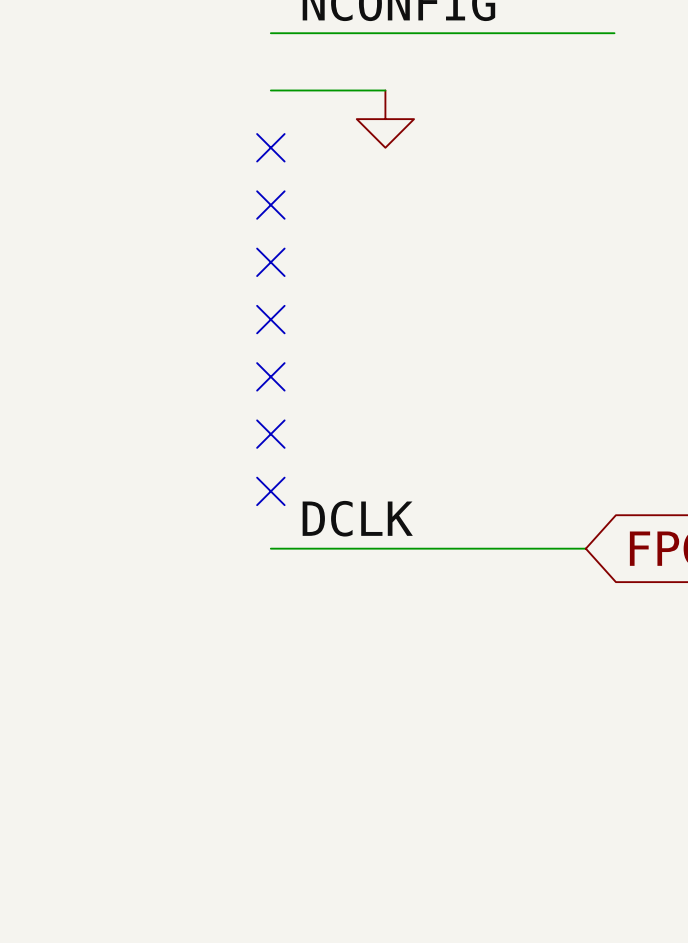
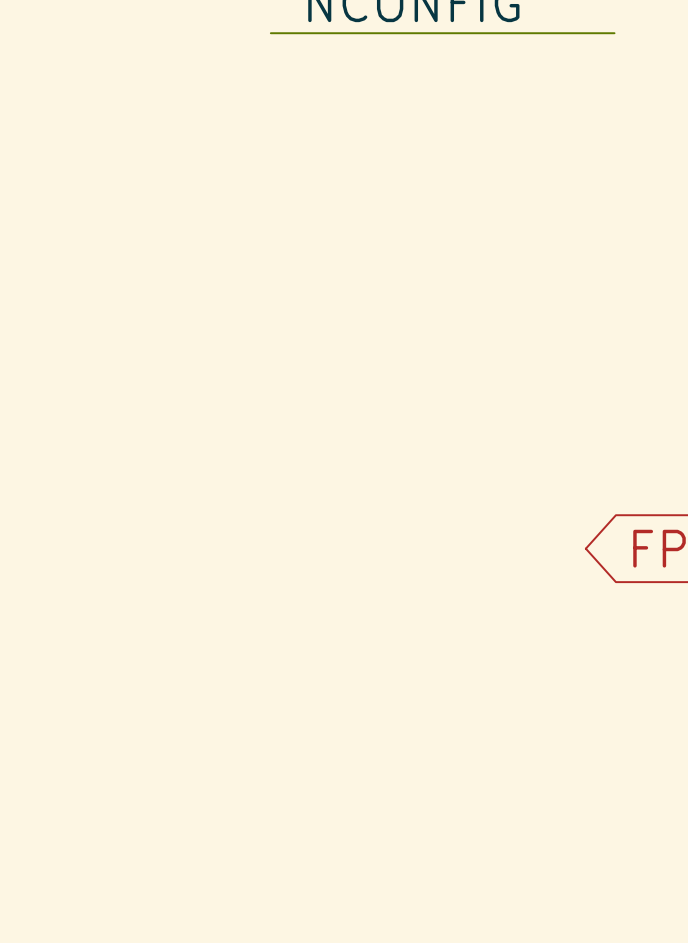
wire: (270, 90) (385, 90) -> none
power symbol: (385, 119) -> none
no-connect mark: (270, 147) -> none
no-connect mark: (270, 205) -> none
no-connect mark: (270, 262) -> none
no-connect mark: (270, 319) -> none
no-connect mark: (270, 376) -> none
no-connect mark: (270, 434) -> none
no-connect mark: (270, 491) -> none
label: DCLK (357, 518) -> none
wire: (270, 548) (585, 548) -> none

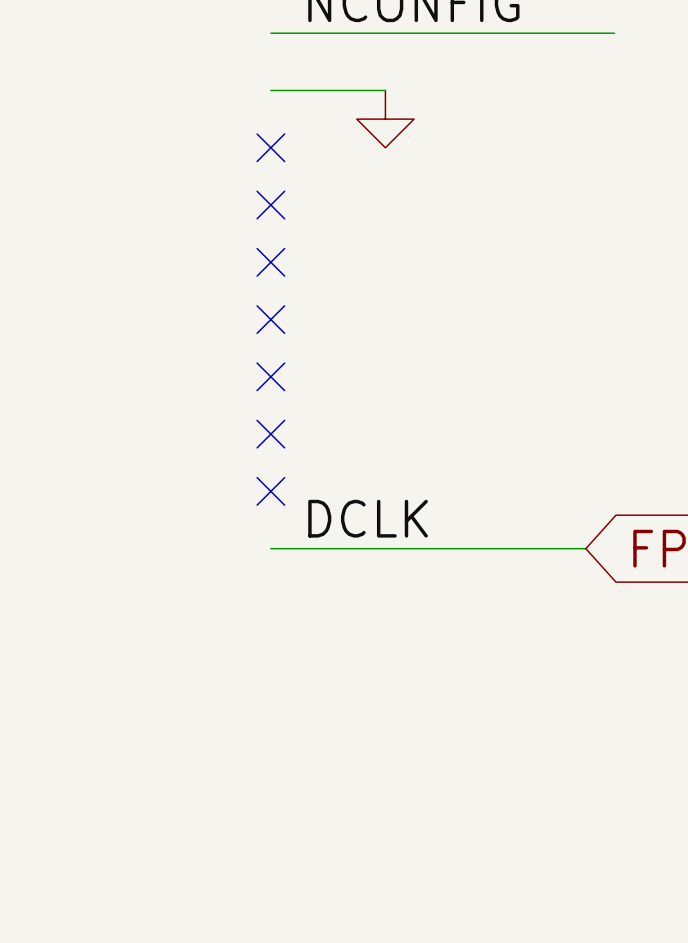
wire: none -> (270, 90) (385, 90)
power symbol: none -> (385, 119)
no-connect mark: none -> (270, 147)
no-connect mark: none -> (270, 205)
no-connect mark: none -> (270, 262)
no-connect mark: none -> (270, 319)
no-connect mark: none -> (270, 376)
no-connect mark: none -> (270, 434)
no-connect mark: none -> (270, 491)
label: none -> DCLK (368, 518)
wire: none -> (270, 548) (585, 548)

